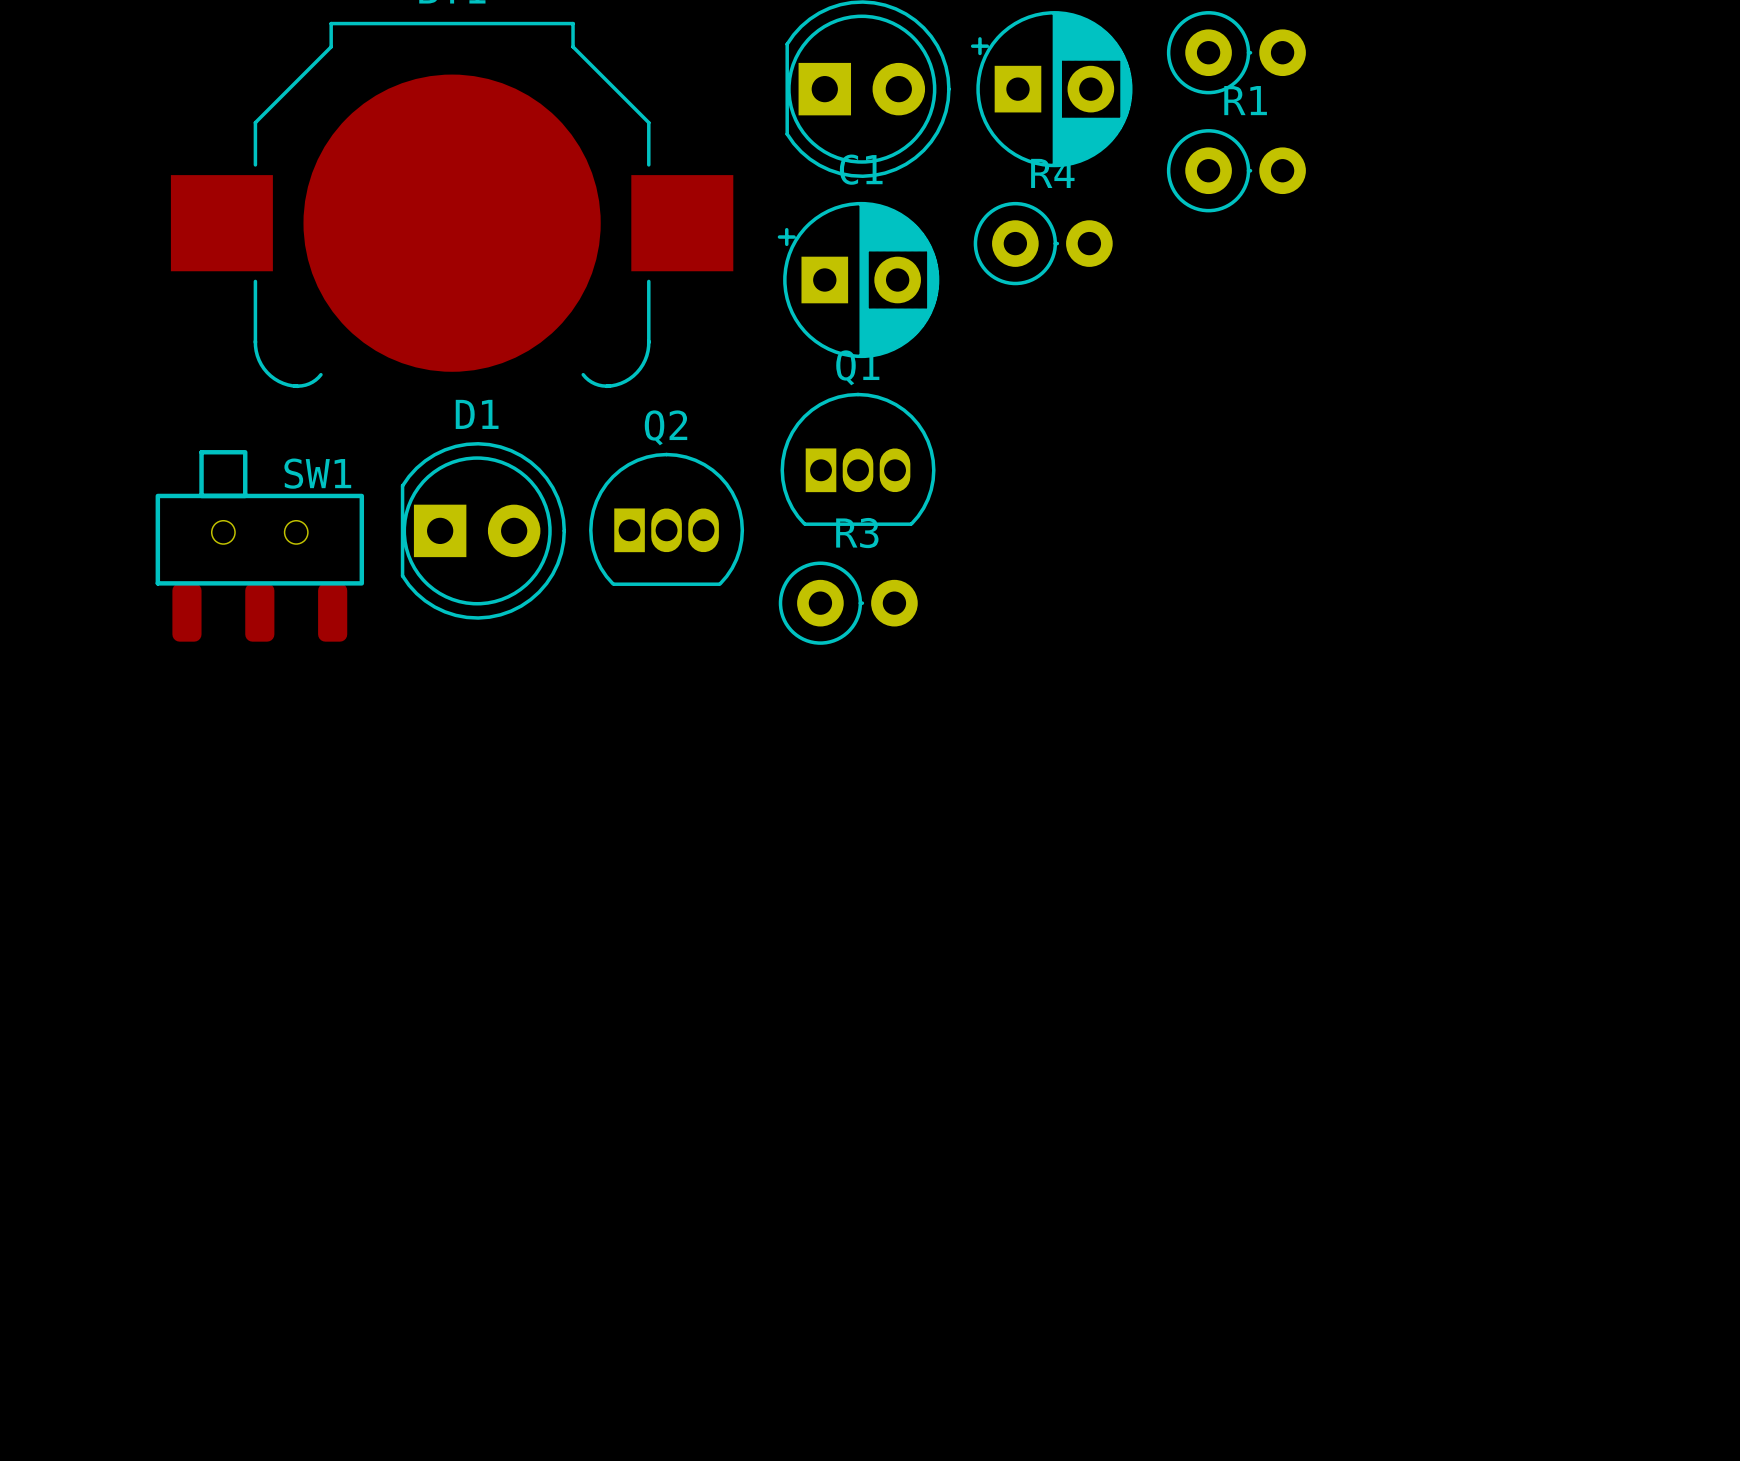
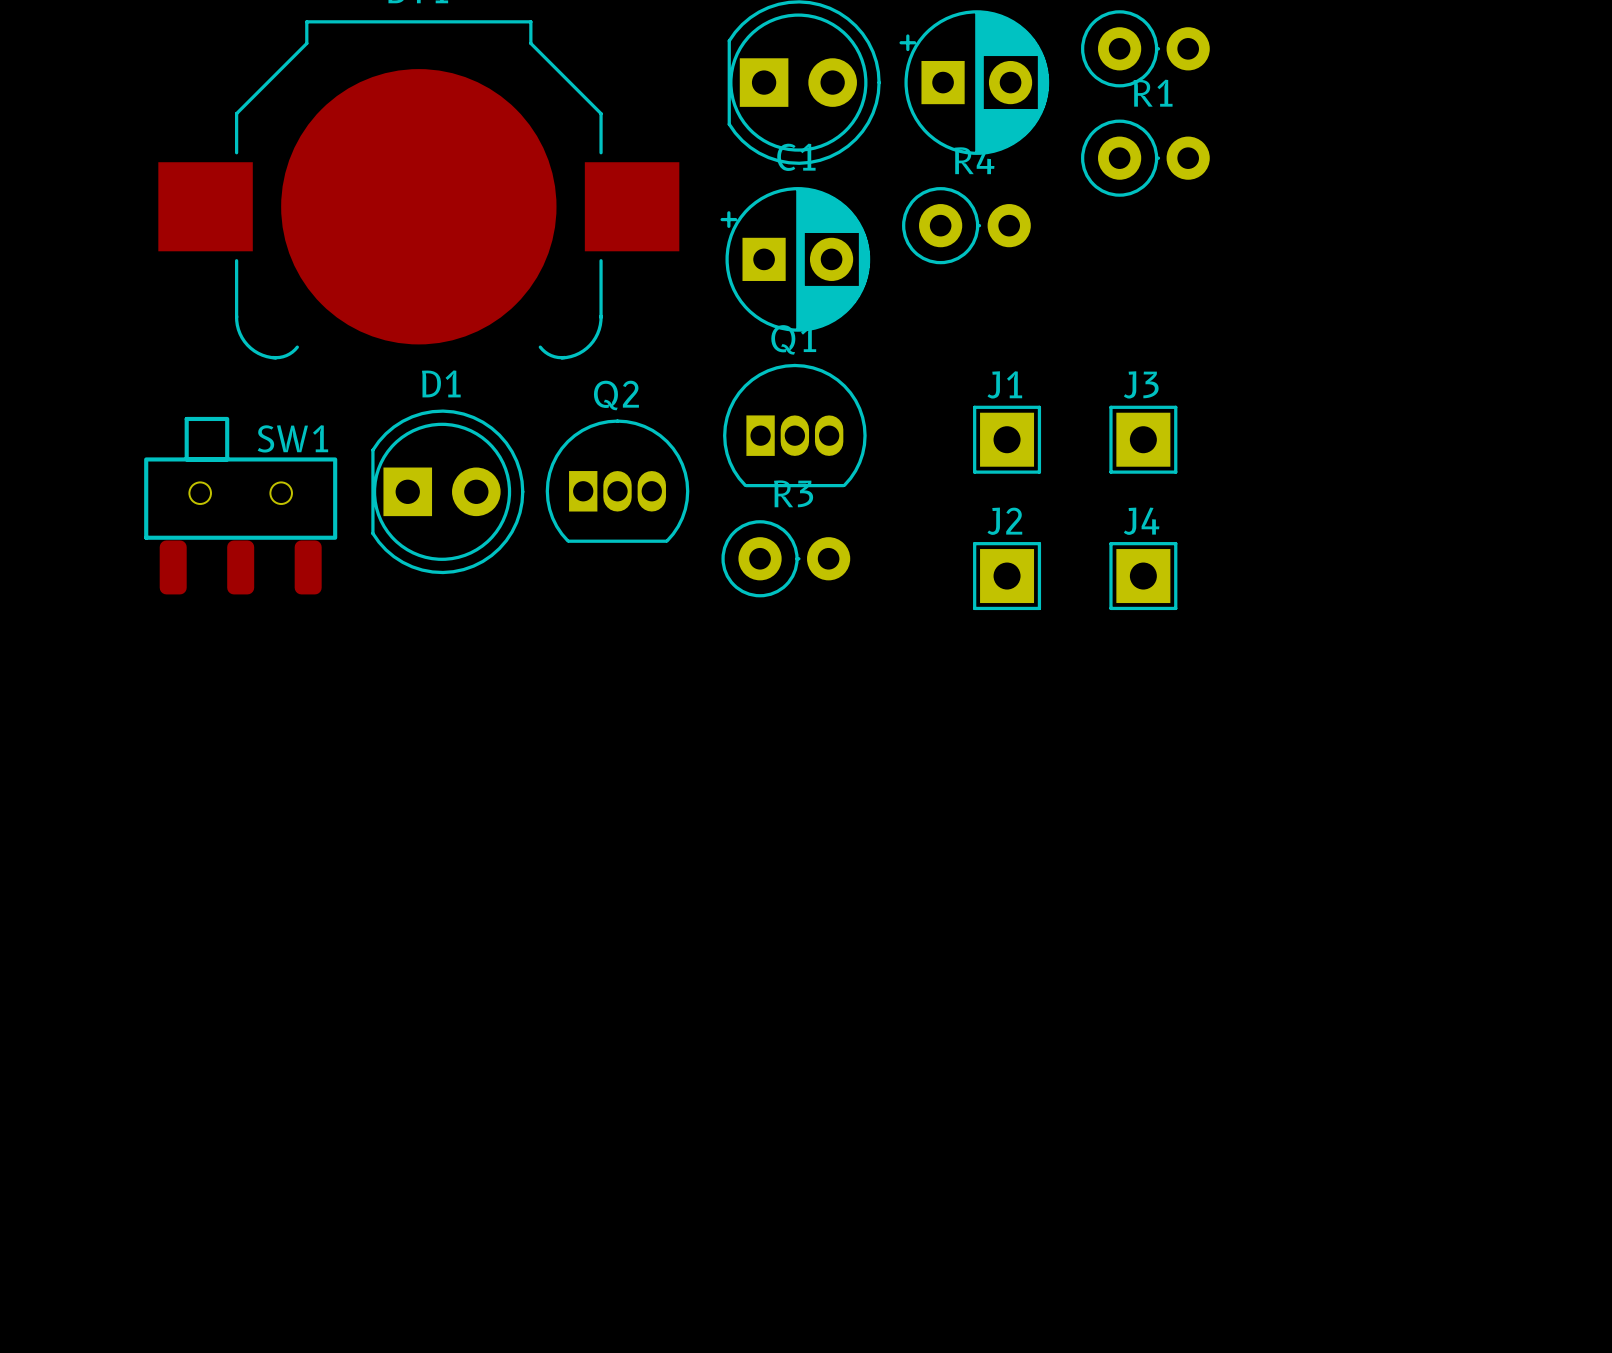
SW1 footprint: [155, 450, 365, 642] -> [144, 416, 338, 595]
J1: none -> (1007, 439)
J3: none -> (1143, 439)
J2: none -> (1007, 576)
J4: none -> (1143, 576)

